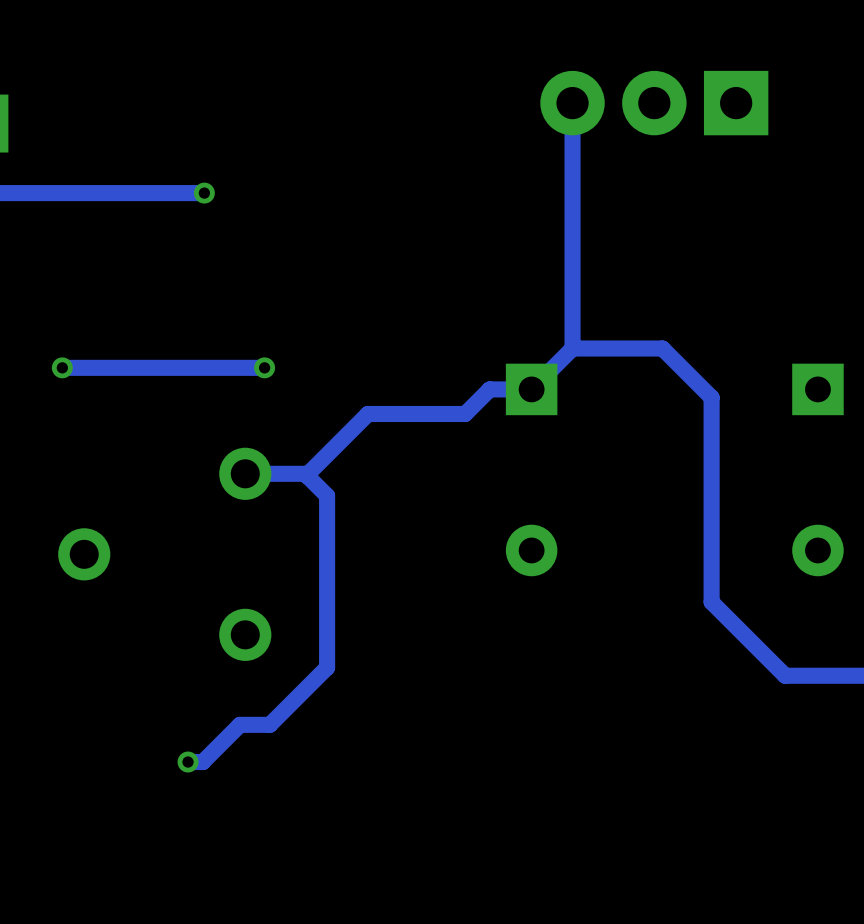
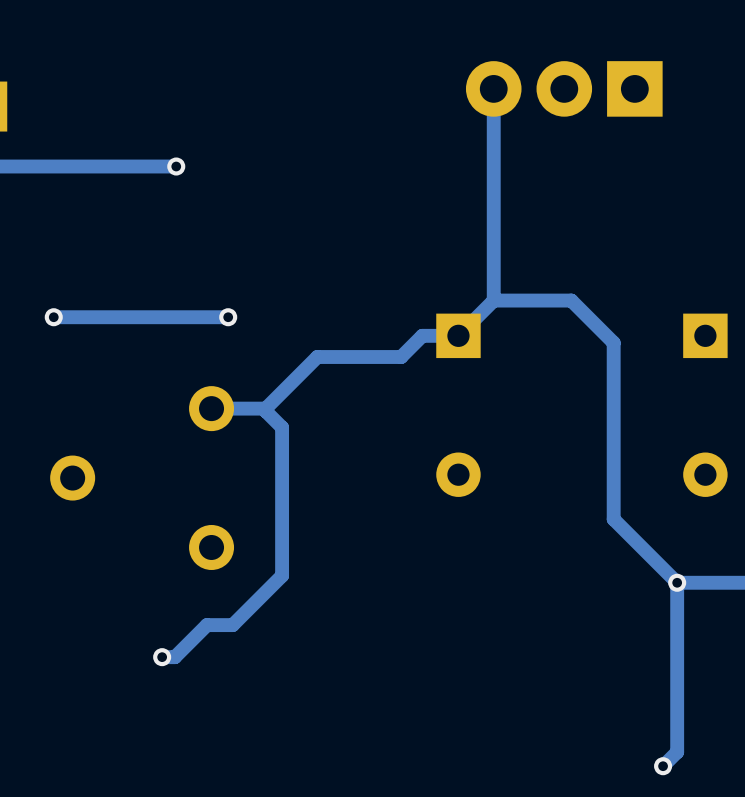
track: none -> (677, 582) (677, 752) (663, 766)
via: none -> (677, 582)
via: none -> (663, 766)

